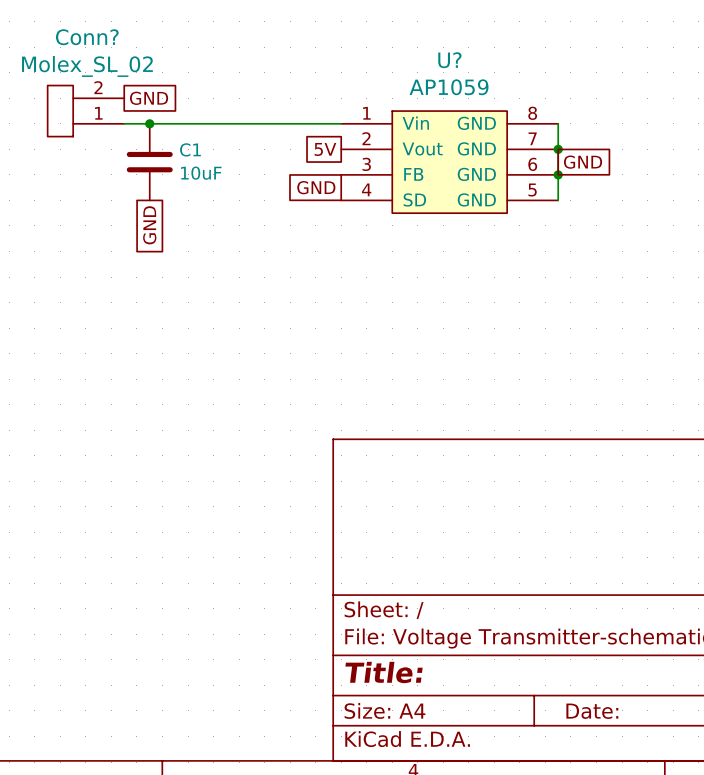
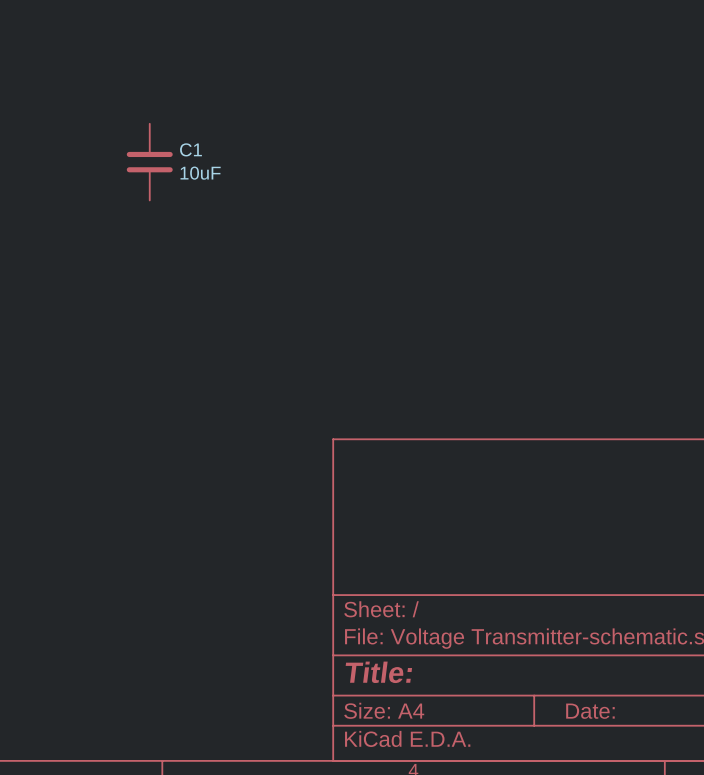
global label: GND (149, 98) -> none
Conn?: Molex_SL_02 (85, 111) -> none
wire: (124, 123) (341, 123) -> none
junction: (149, 123) -> none
wire: (558, 123) (558, 200) -> none
global label: 5V (325, 149) -> none
junction: (558, 149) -> none
U?: AP1059 (449, 162) -> none
global label: GND (583, 162) -> none
junction: (558, 174) -> none
global label: GND (316, 187) -> none
global label: GND (149, 225) -> none

